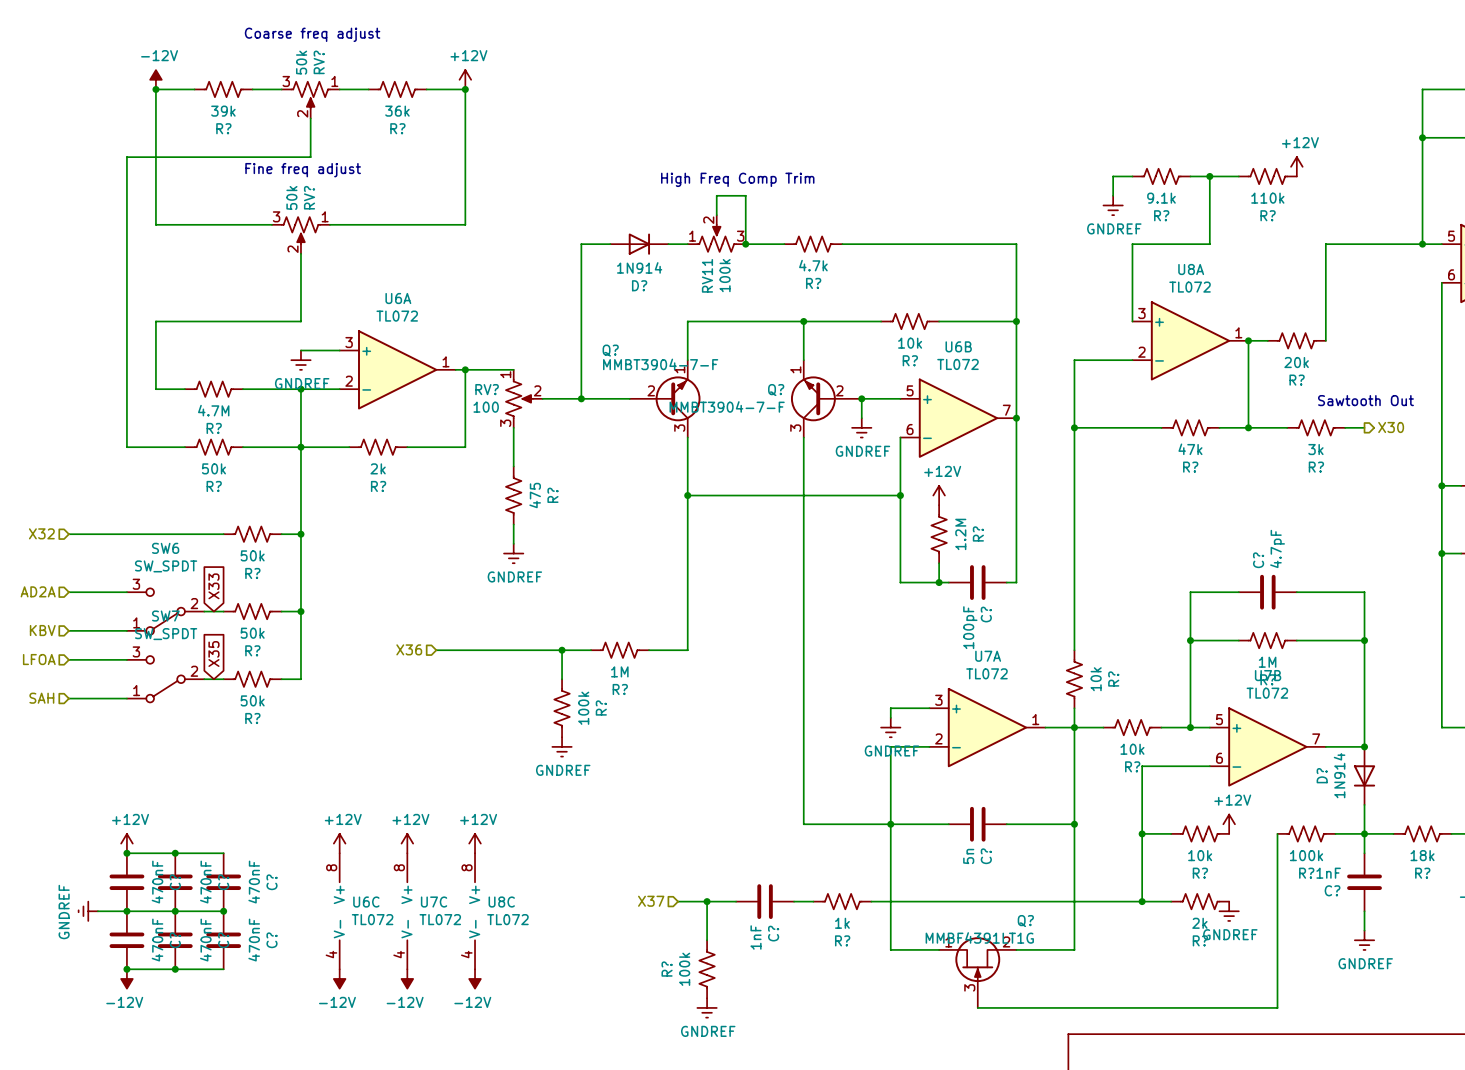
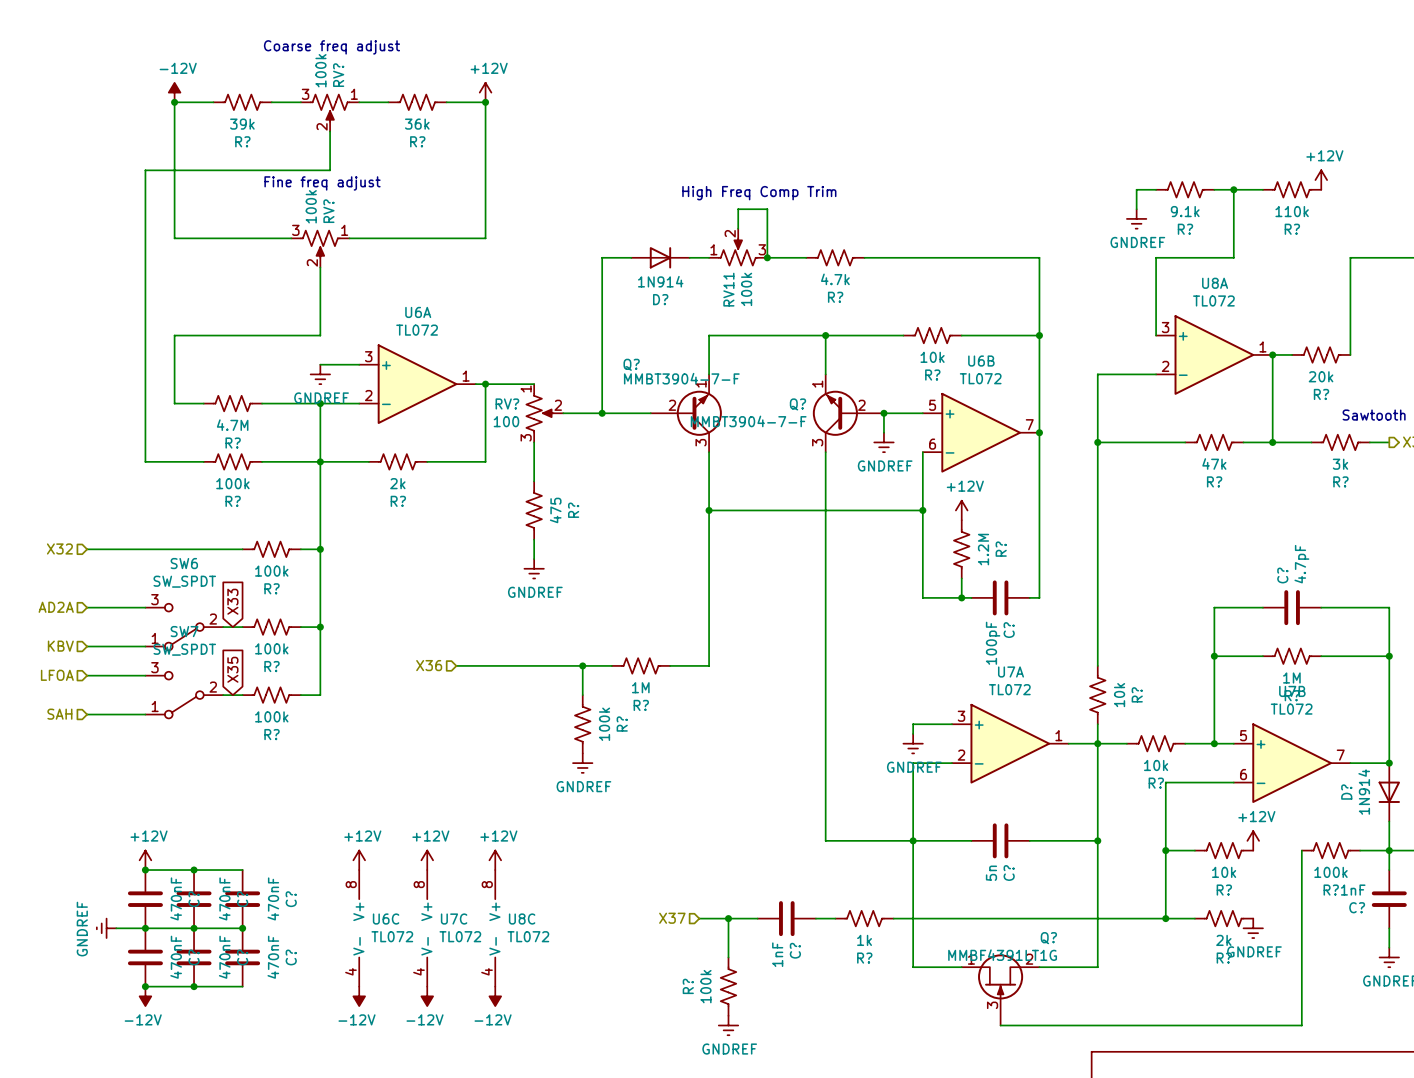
RV? value: 50k (301, 62) -> 100k (320, 70)
RV? value: 50k (291, 197) -> 100k (311, 206)
R? value: 50k (213, 468) -> 100k (232, 483)
R? value: 50k (252, 555) -> 100k (271, 571)
R? value: 50k (252, 633) -> 100k (271, 648)
R? value: 50k (252, 700) -> 100k (271, 716)

